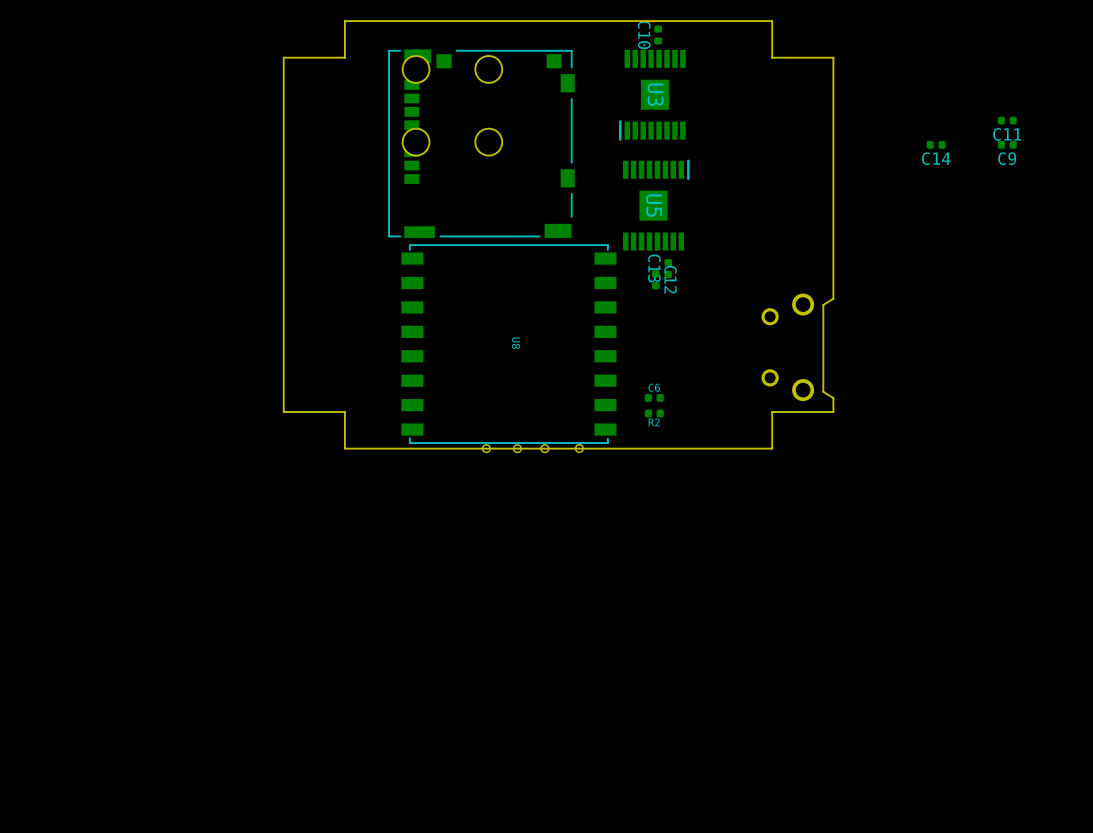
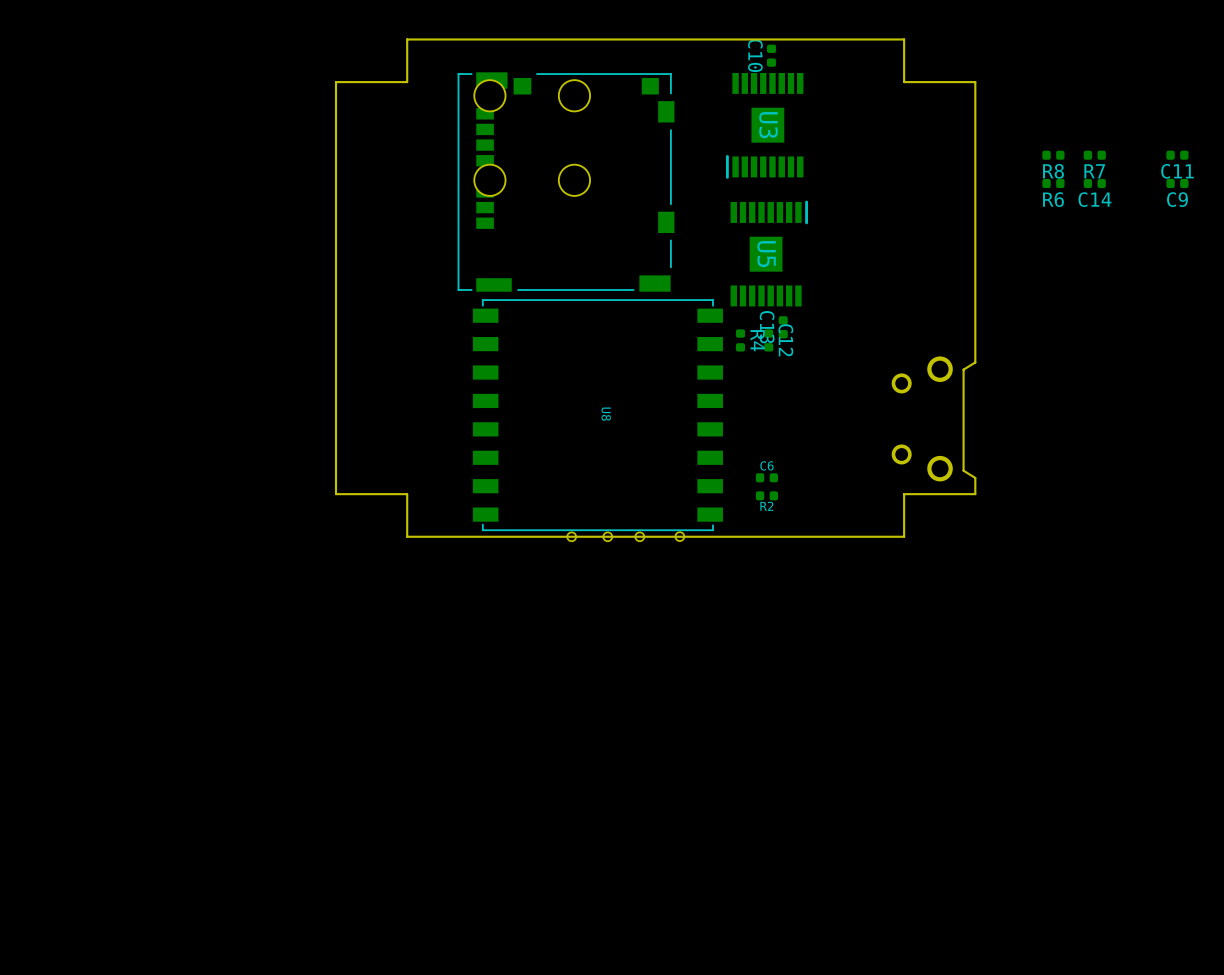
R8: none -> (1053, 155)
R7: none -> (1094, 155)
R6: none -> (1053, 183)
R4: none -> (740, 340)

